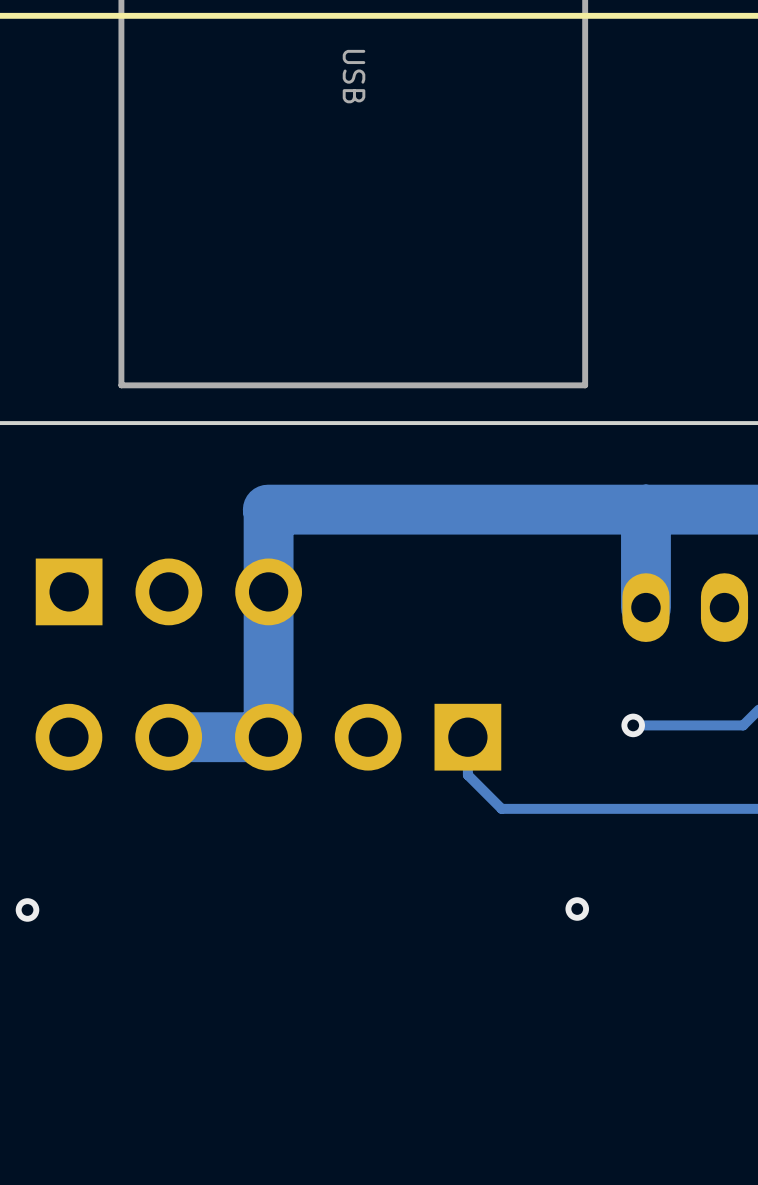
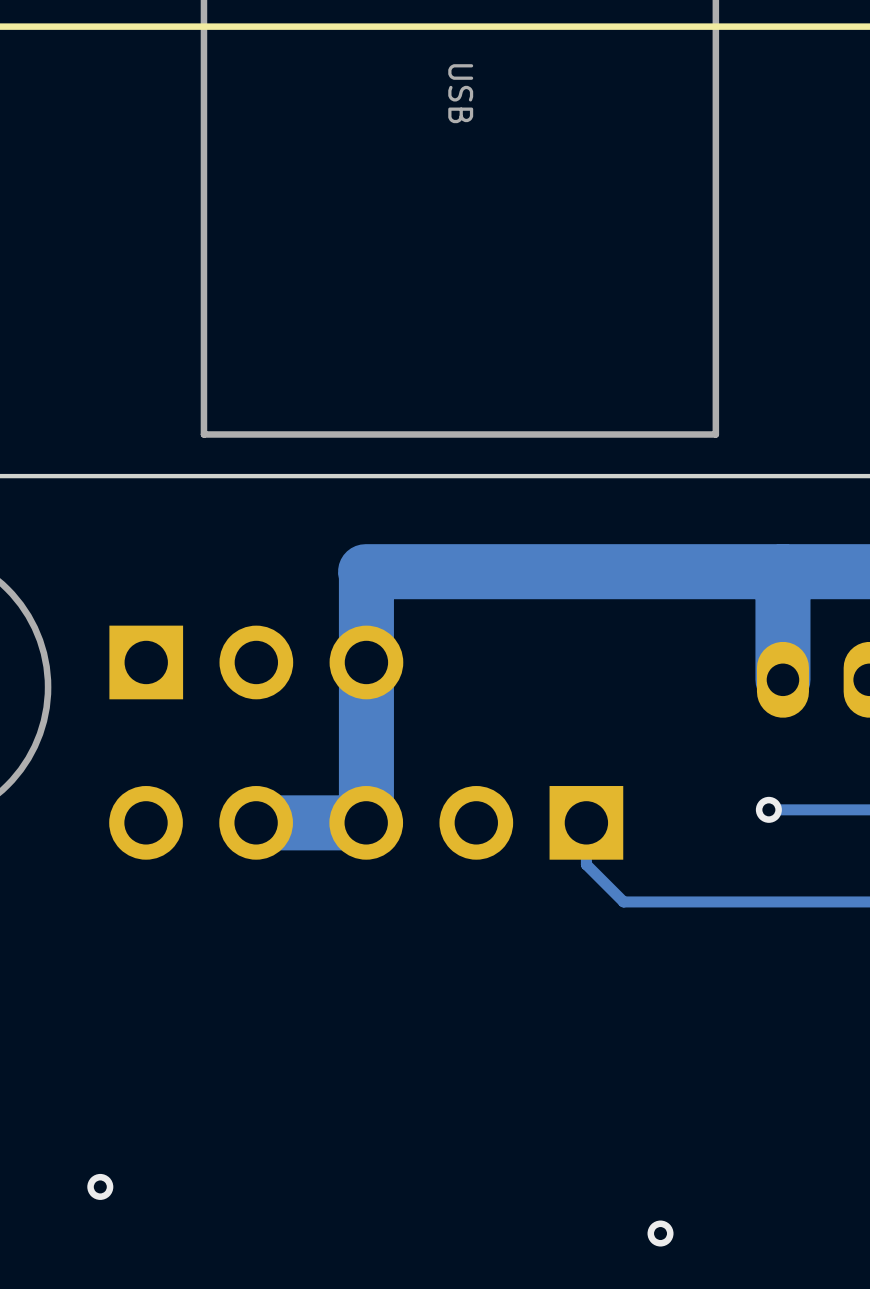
via: (577, 908) -> none
via position: (27, 909) -> (100, 1186)
via: none -> (660, 1233)

